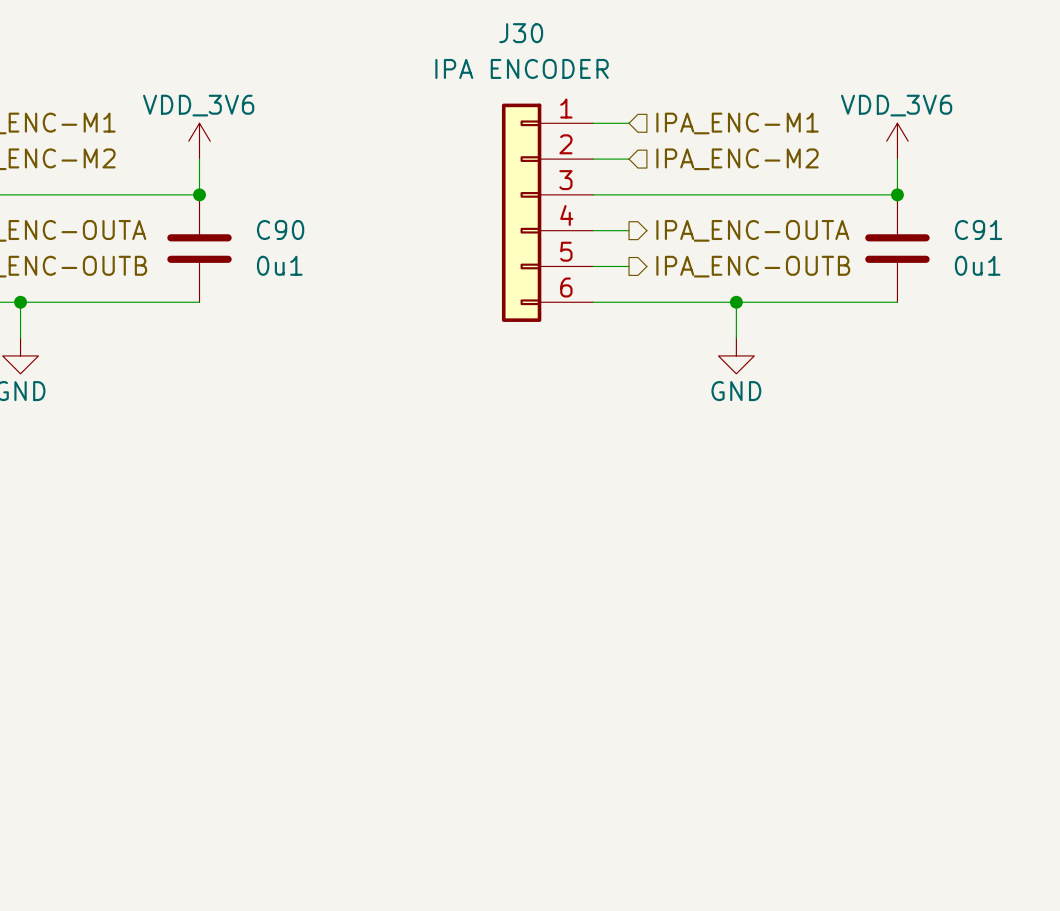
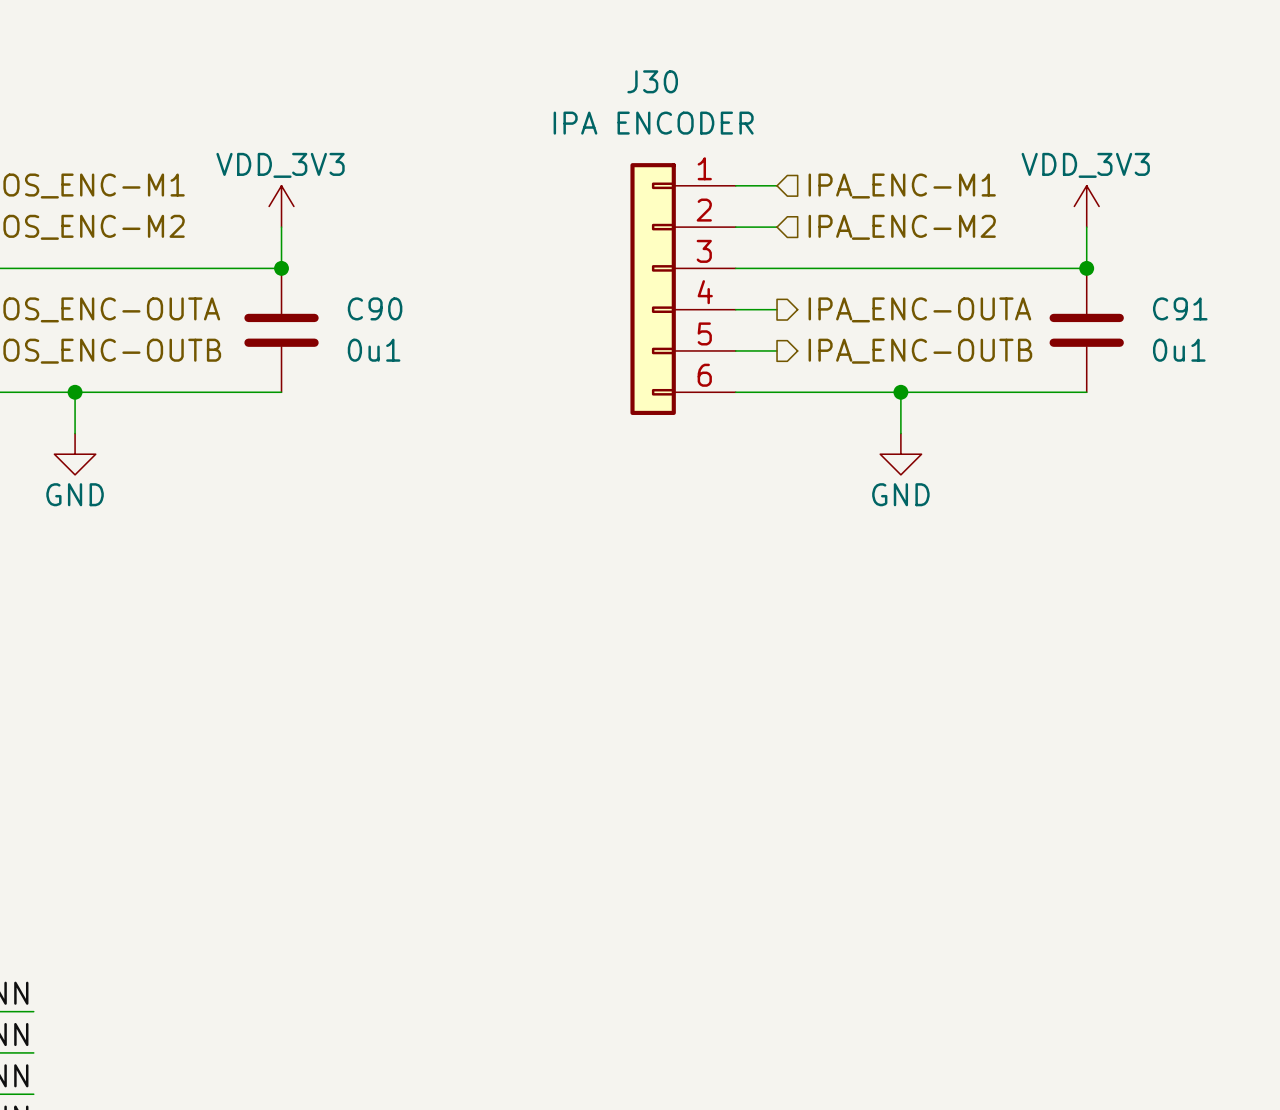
power symbol: VDD_3V6 (199, 141) -> VDD_3V3 (281, 206)
power symbol: VDD_3V6 (897, 141) -> VDD_3V3 (1086, 206)

